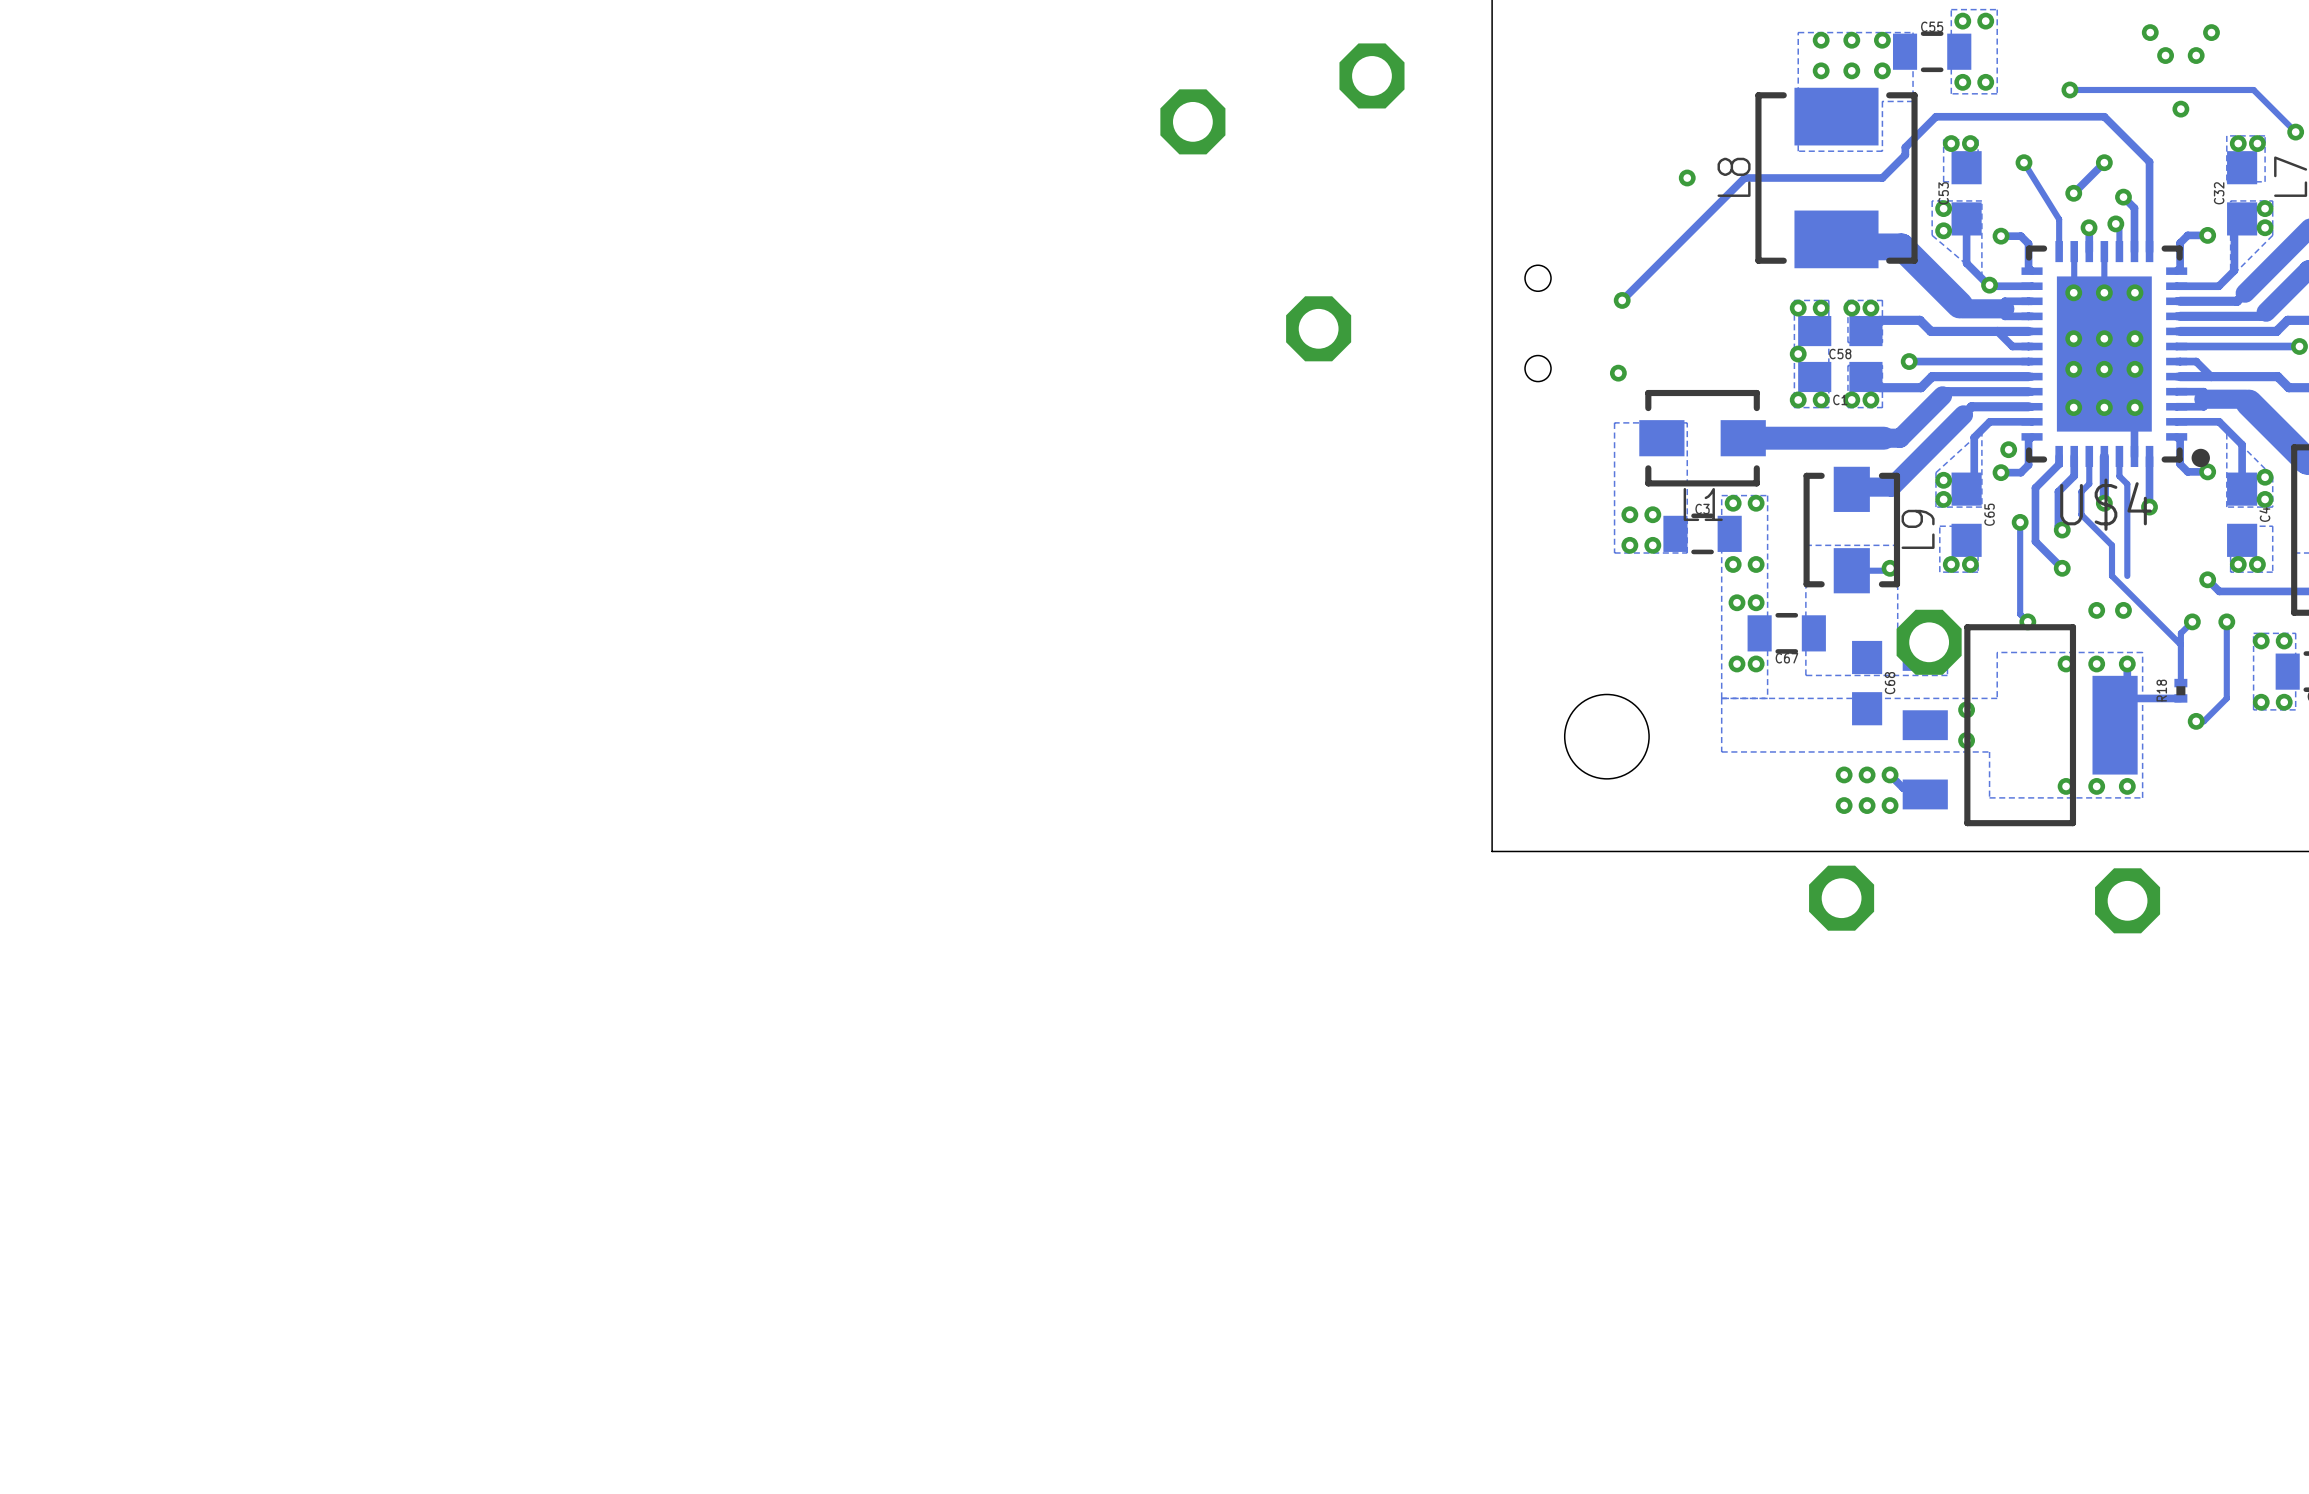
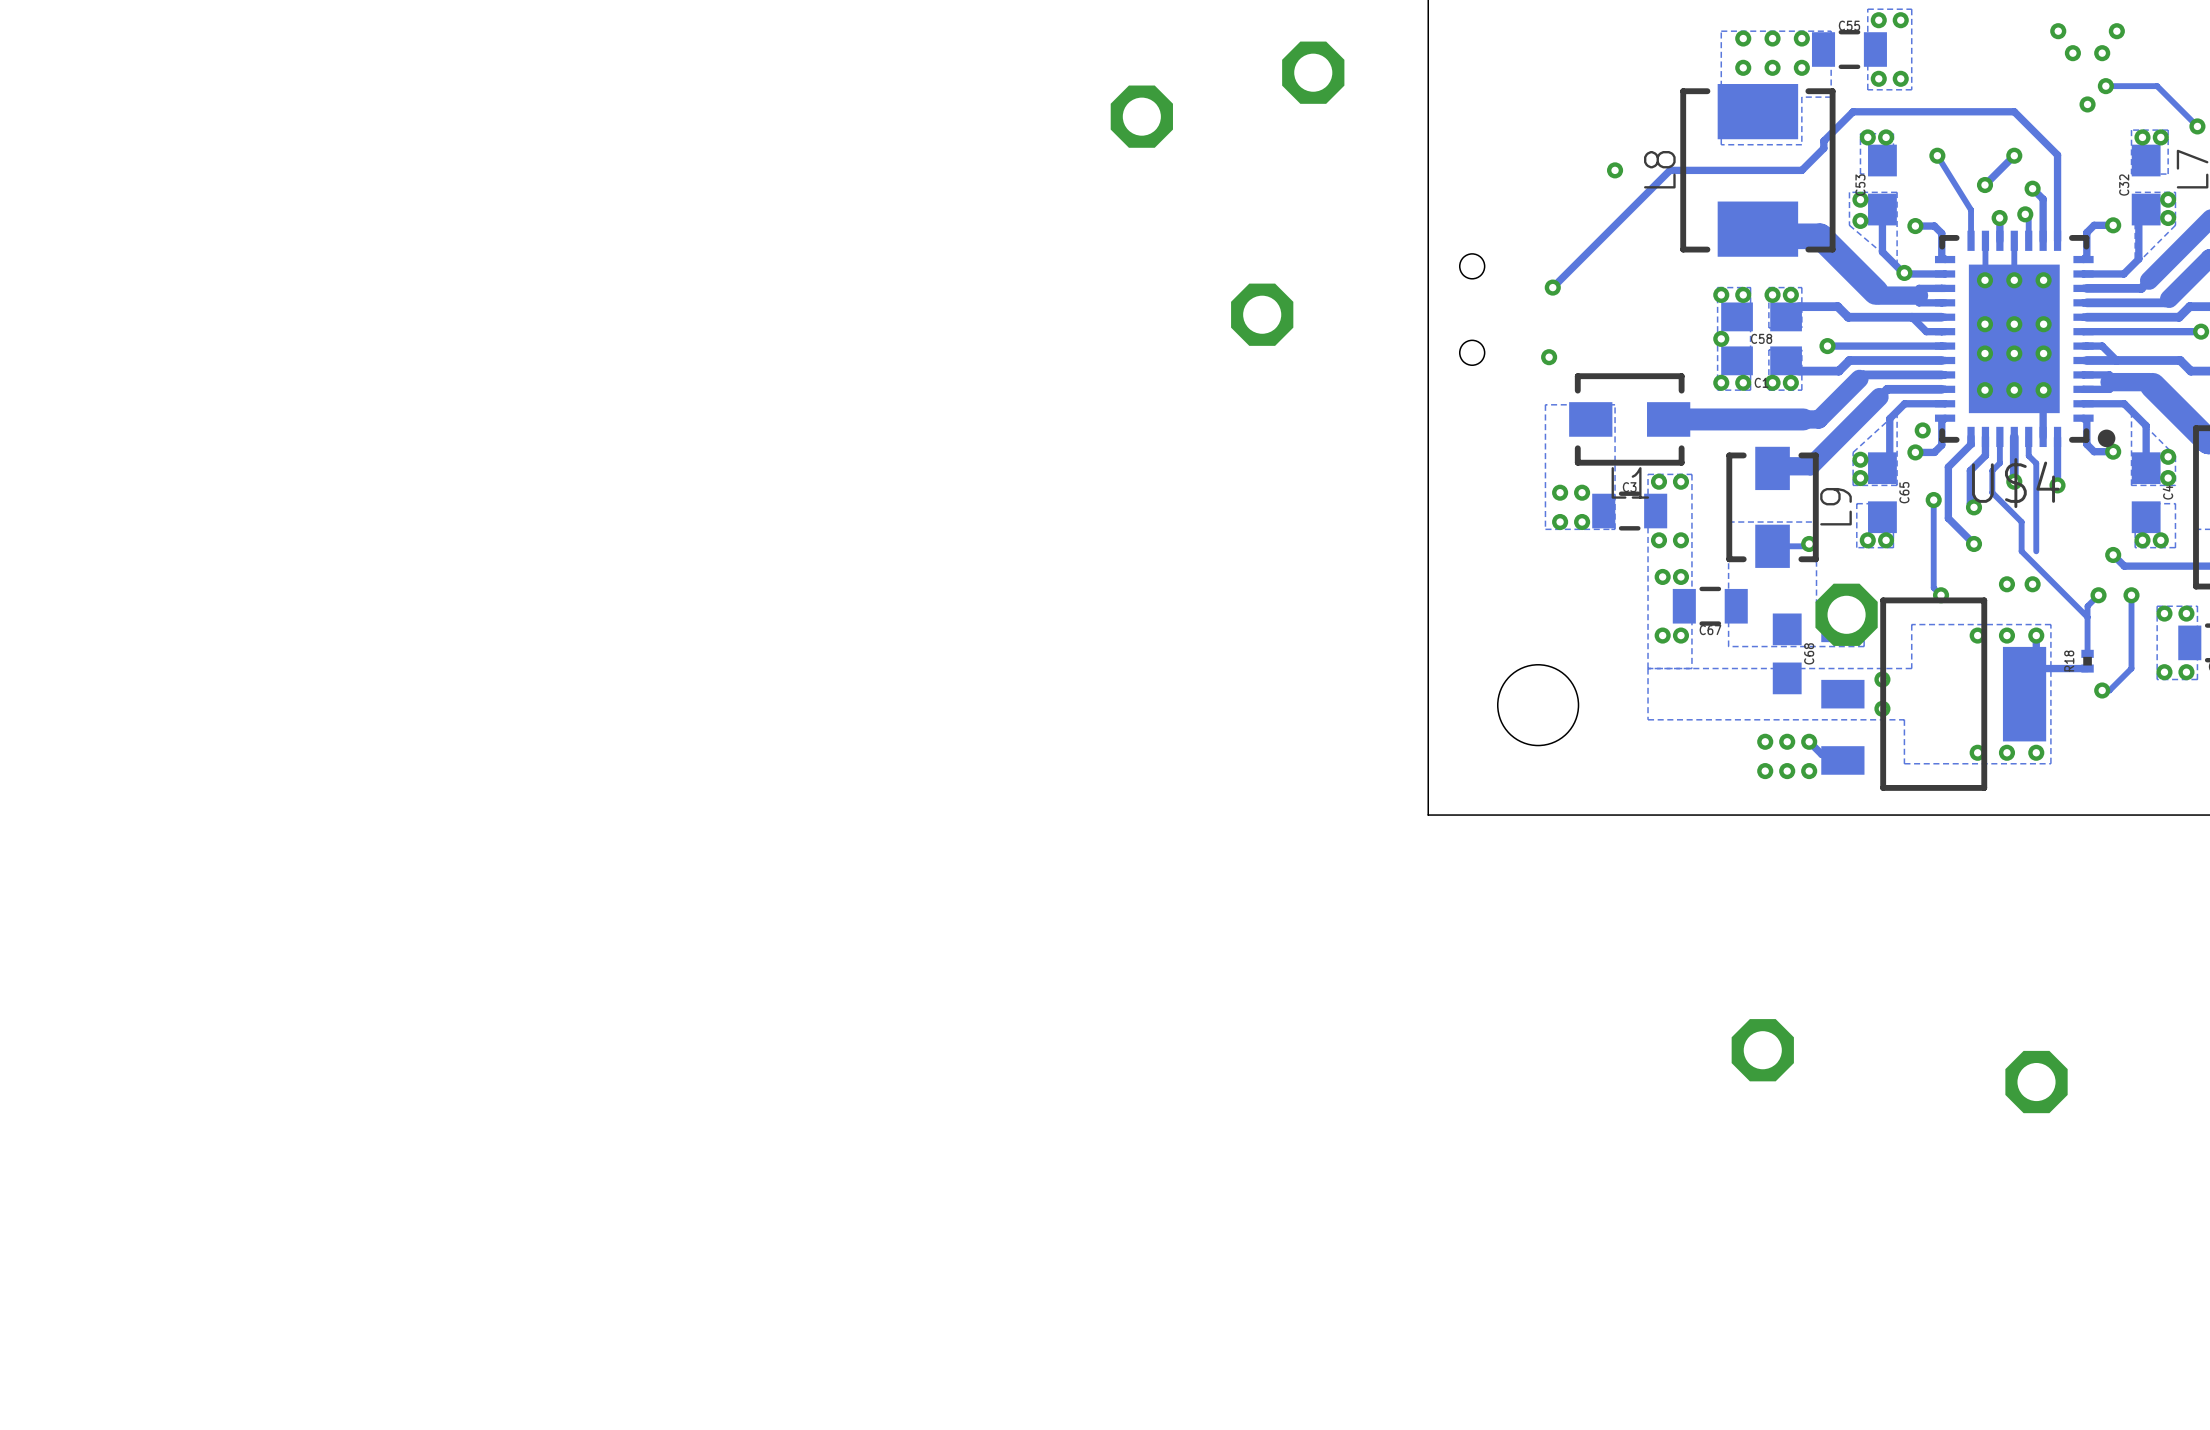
via position: (2069, 89) -> (2105, 86)
track: (2200, 89) (2069, 89) -> none
part: (1841, 898) -> none
part: (2127, 900) -> none
part: none -> (1762, 1050)
part: none -> (2036, 1082)

